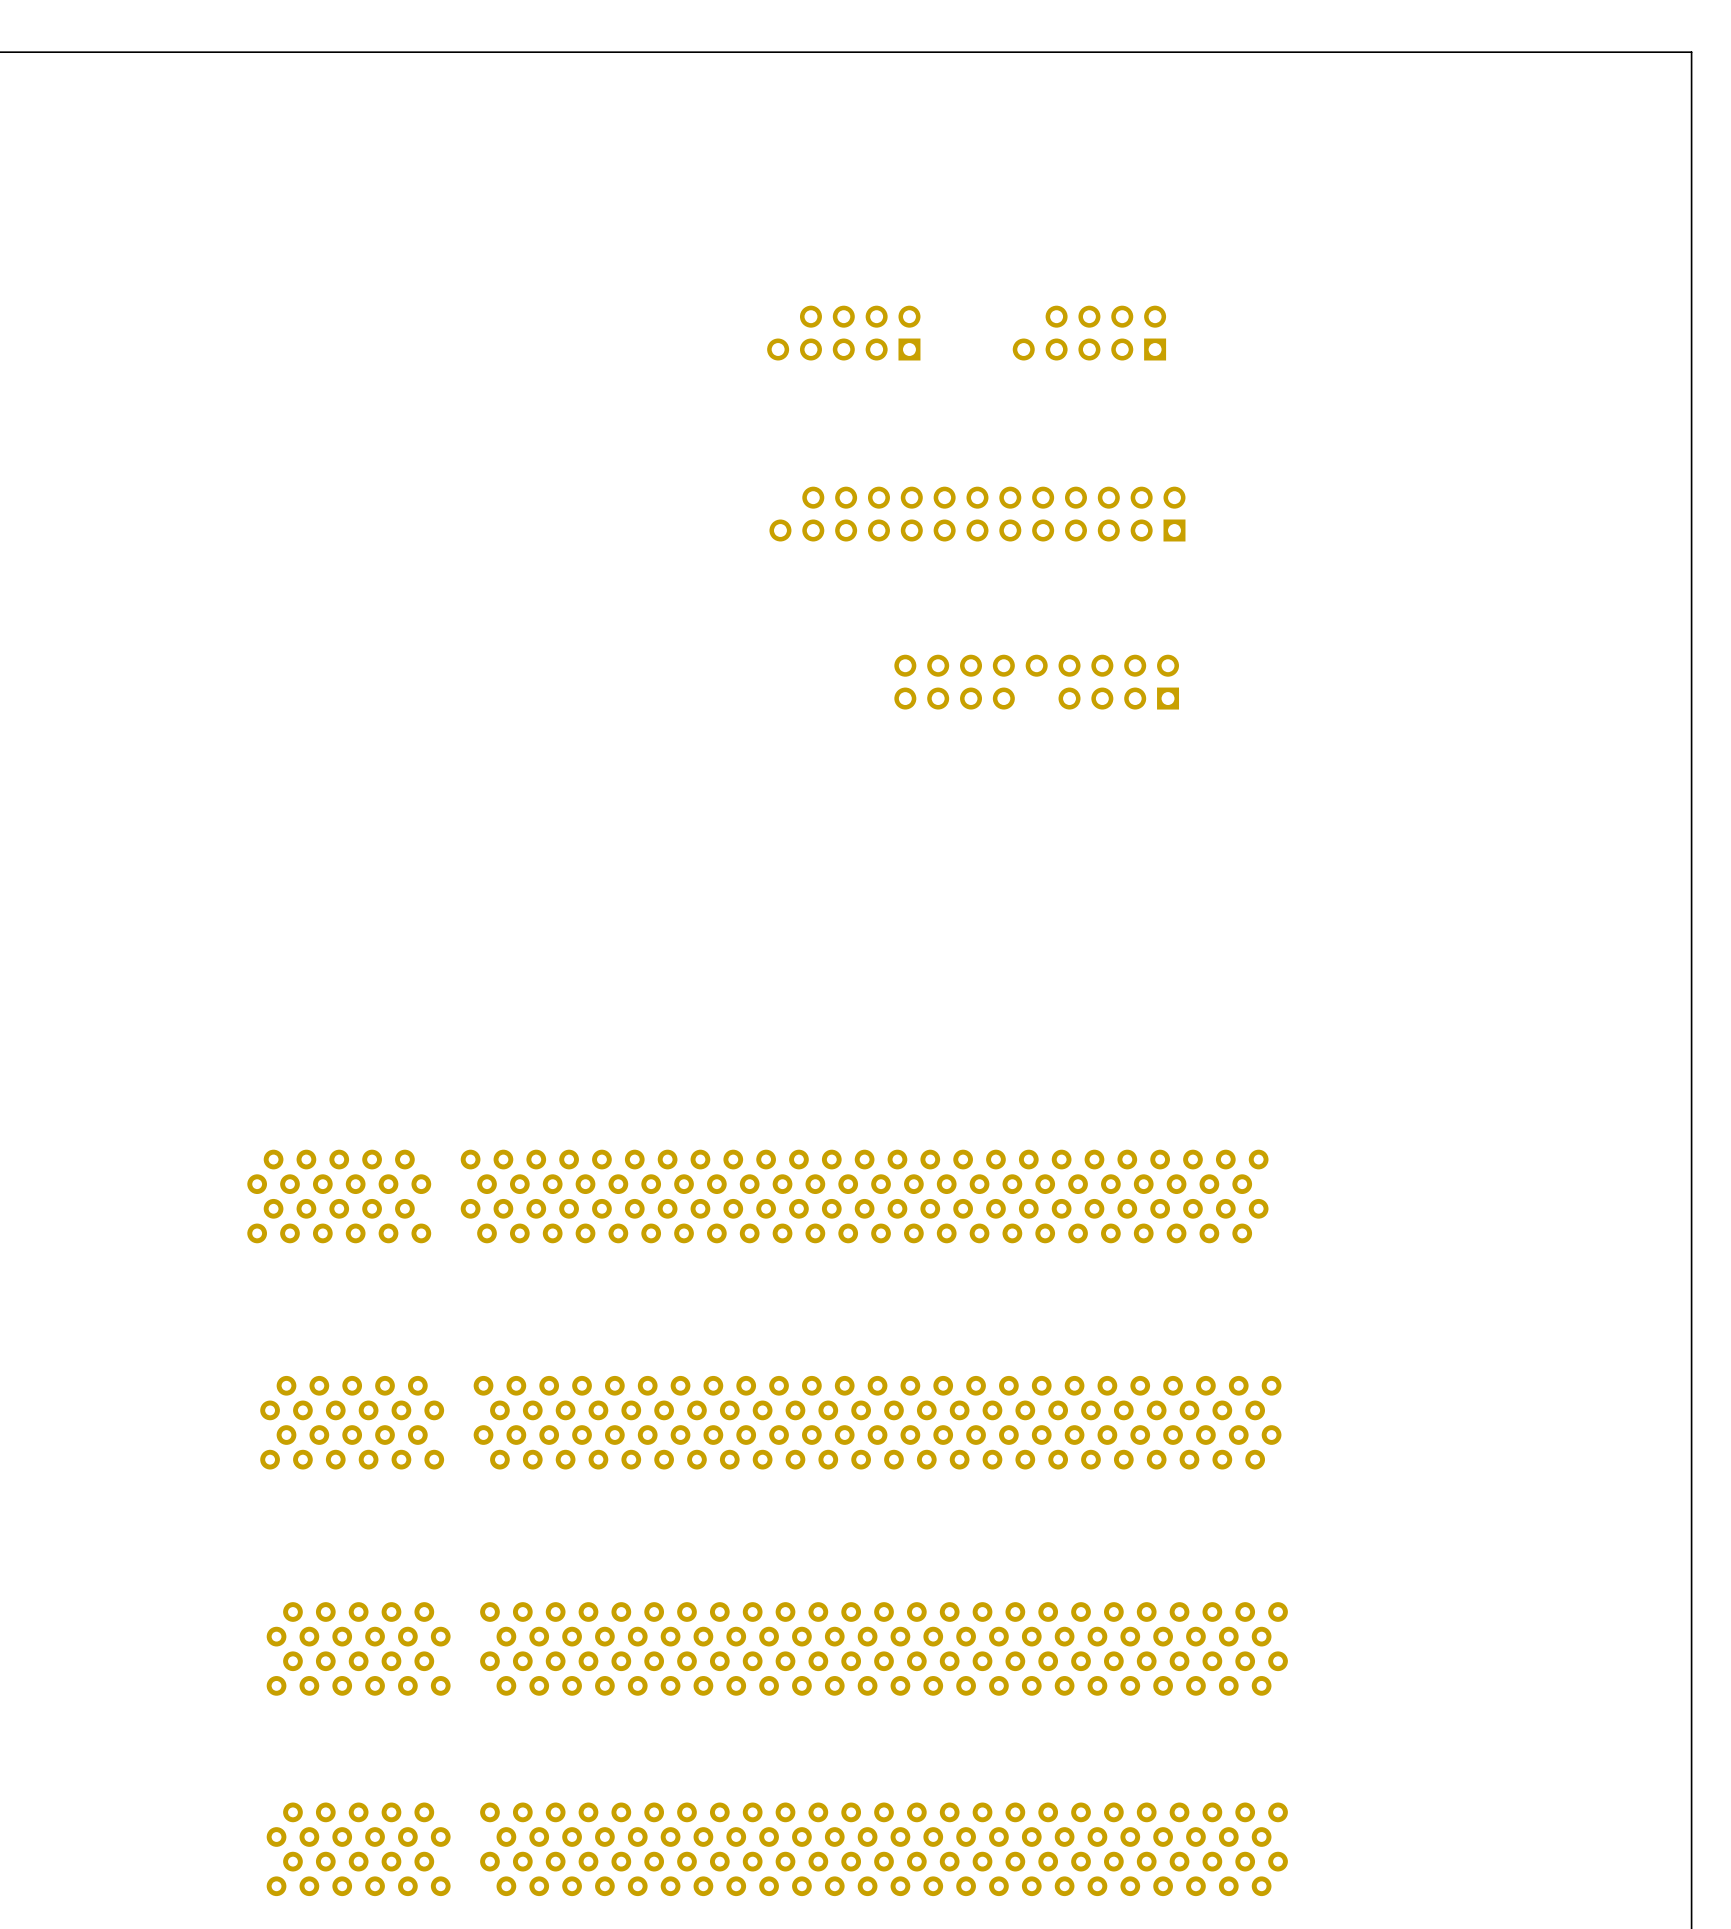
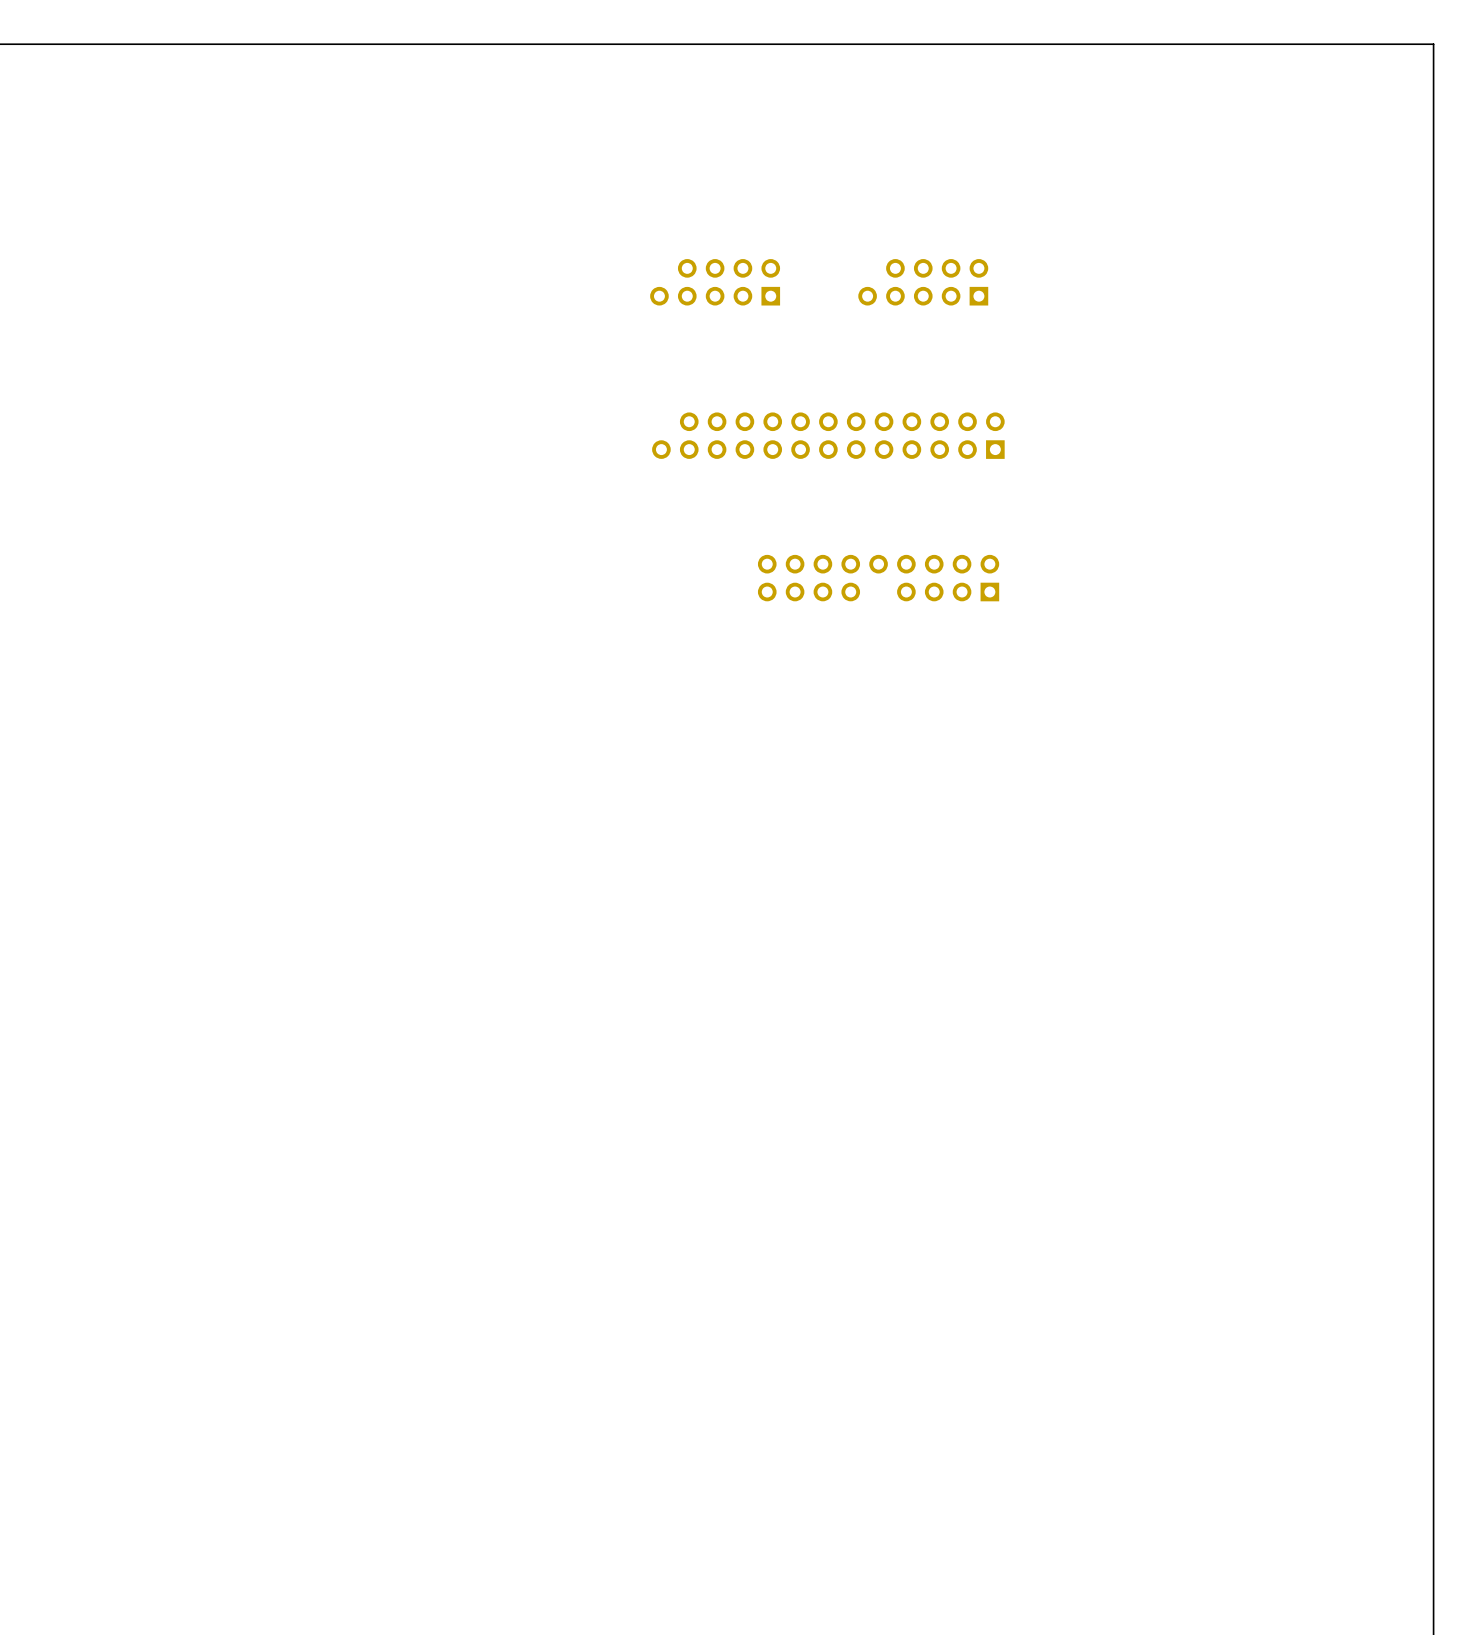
part: (757, 1196) -> none
part: (770, 1422) -> none
part: (777, 1648) -> none
part: (777, 1849) -> none

